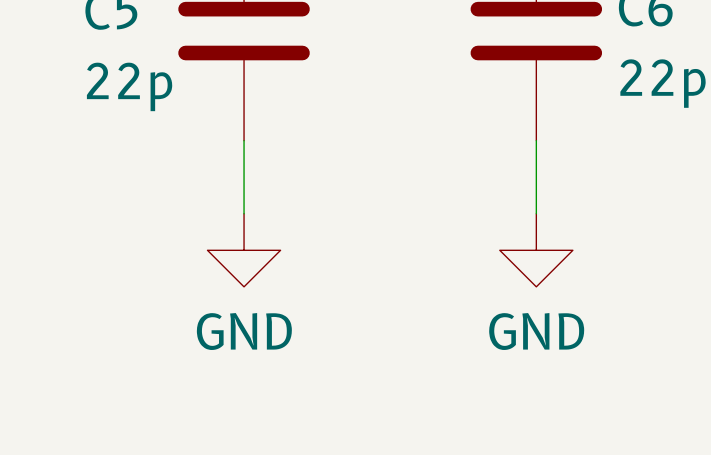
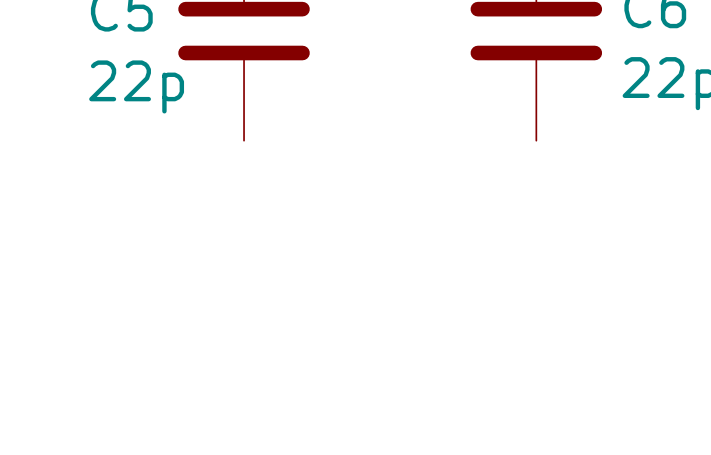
wire: (244, 140) (244, 213) -> none
wire: (536, 140) (536, 213) -> none
power symbol: GND (244, 250) -> none
power symbol: GND (536, 250) -> none

